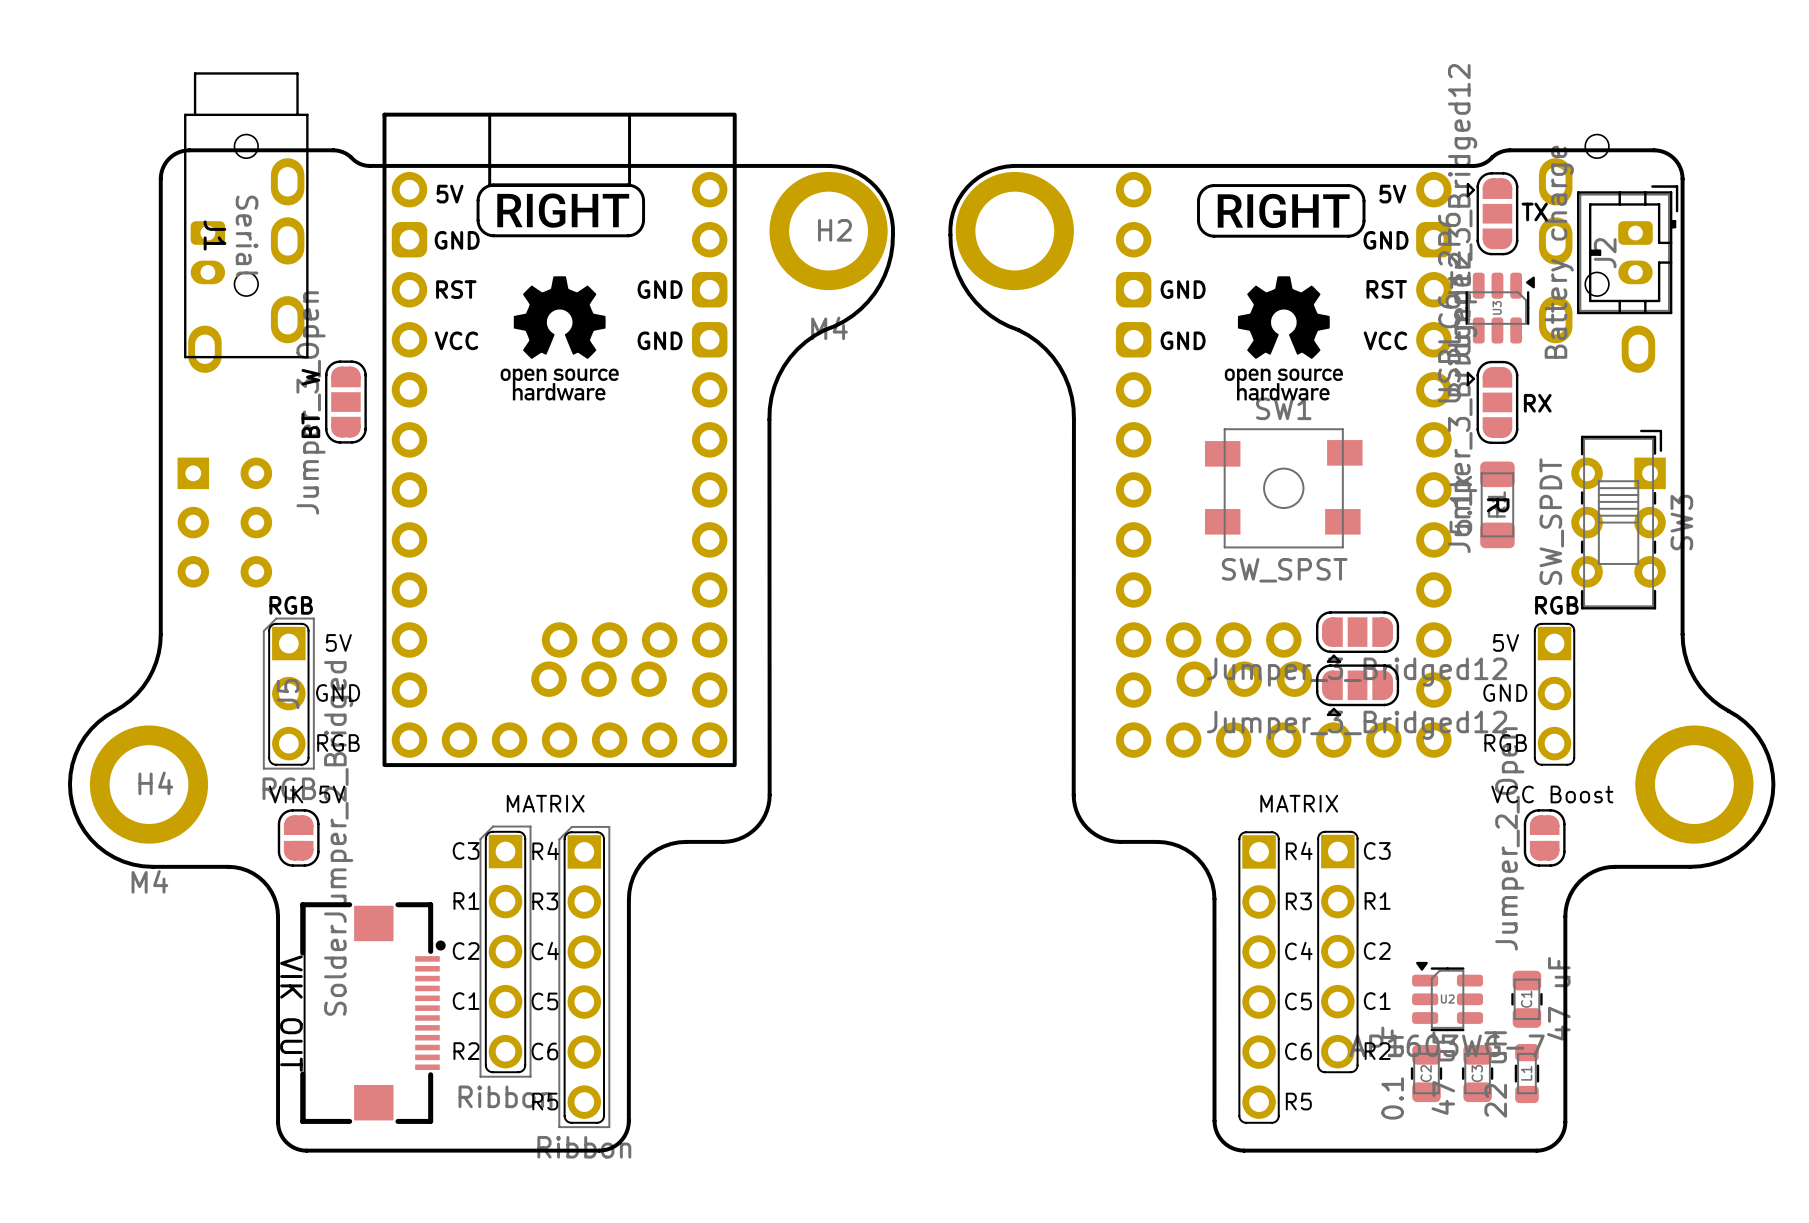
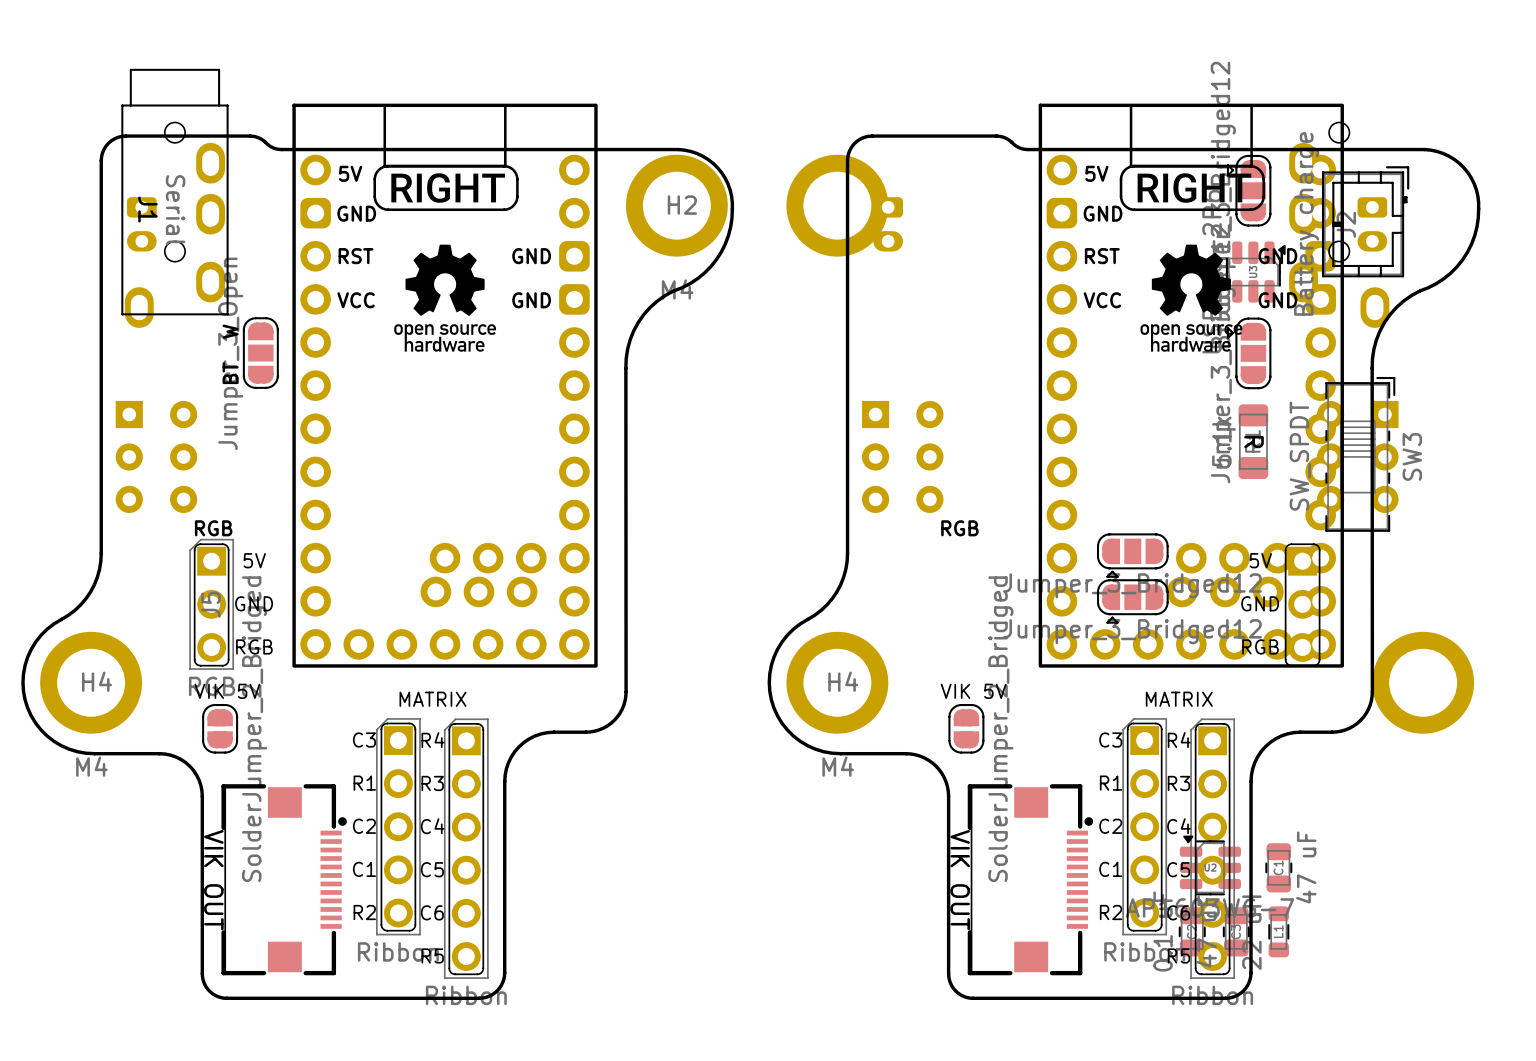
board edge: (1235, 165) (1013, 165) (998, 168) (978, 177) (962, 193) (952, 212) (950, 234) (954, 265) (968, 293) (990, 315) (1028, 335) (1045, 349) (1059, 366) (1068, 386) (1073, 419) (1074, 805) (1083, 824) (1100, 837) (1115, 841) (1164, 842) (1179, 846) (1197, 858) (1210, 877) (1214, 899) (1214, 1124) (1223, 1141) (1232, 1148) (1243, 1150) -> (1028, 149) (1019, 147) (1007, 138) (999, 136) (872, 136) (859, 139) (849, 151) (847, 160) (847, 561) (840, 584) (832, 598) (821, 610) (787, 635) (777, 649) (769, 673) (771, 699) (777, 715) (787, 729) (807, 745) (832, 753) (915, 754) (928, 760) (942, 773) (946, 782) (948, 796) (948, 976) (955, 991) (965, 996) (973, 998)
board edge: (1473, 165) (1483, 163) (1497, 153) (1506, 150) (1653, 150) (1671, 156) (1680, 167) (1682, 178) (1683, 643) (1687, 662) (1700, 686) (1713, 700) (1737, 716) (1752, 729) (1763, 745) (1772, 774) (1772, 794) (1763, 822) (1745, 846) (1728, 857) (1700, 866) (1603, 868) (1583, 877) (1572, 890) (1568, 900) (1565, 916) (1565, 1125) (1562, 1134) (1554, 1144) (1546, 1149) (1536, 1150) -> (1232, 149) (1424, 149) (1437, 151) (1454, 159) (1468, 172) (1476, 190) (1478, 209) (1474, 235) (1462, 259) (1443, 278) (1411, 295) (1396, 307) (1384, 322) (1376, 339) (1372, 368) (1371, 700) (1363, 717) (1349, 728) (1336, 731) (1293, 732) (1281, 735) (1265, 746) (1254, 762) (1251, 781) (1250, 976) (1243, 990) (1235, 996) (1225, 998)
line: (1213, 185) (1352, 186) (1359, 190) (1363, 196) (1363, 224) (1357, 232) (1348, 236) (1210, 235) (1203, 231) (1199, 224) (1198, 200) (1203, 190) (1213, 185) -> (1134, 166) (1253, 166) (1259, 169) (1263, 175) (1263, 200) (1258, 206) (1250, 209) (1131, 209) (1125, 205) (1121, 199) (1121, 179) (1125, 170) (1134, 166)
drawing position: (1283, 210) -> (1194, 188)
text: TX (1534, 211) -> none
part: none -> (888, 224)
drawing position: (1283, 338) -> (1191, 298)
text: RX (1537, 403) -> none
part side: bottom (1283, 464) -> top (1191, 385)
SW1: SW_SPST (1283, 488) -> none
part: none -> (902, 456)
text position: RGB (1556, 605) -> RGB (959, 528)
H4: none -> M4 (837, 682)
text: none -> VIK 5V (973, 691)
text: VCC Boost (1552, 794) -> none
text position: MATRIX (1299, 803) -> MATRIX (1179, 699)
part: none -> SolderJumper_2_Bridged (966, 728)
part: Jumper_2_Open (1544, 837) -> none
part side: bottom (1337, 952) -> top (1144, 826)
part side: bottom (1259, 977) -> top (1212, 848)
part: none -> (1030, 879)
board edge: (1465, 1150) (1536, 1150) -> (973, 998) (1034, 998)

